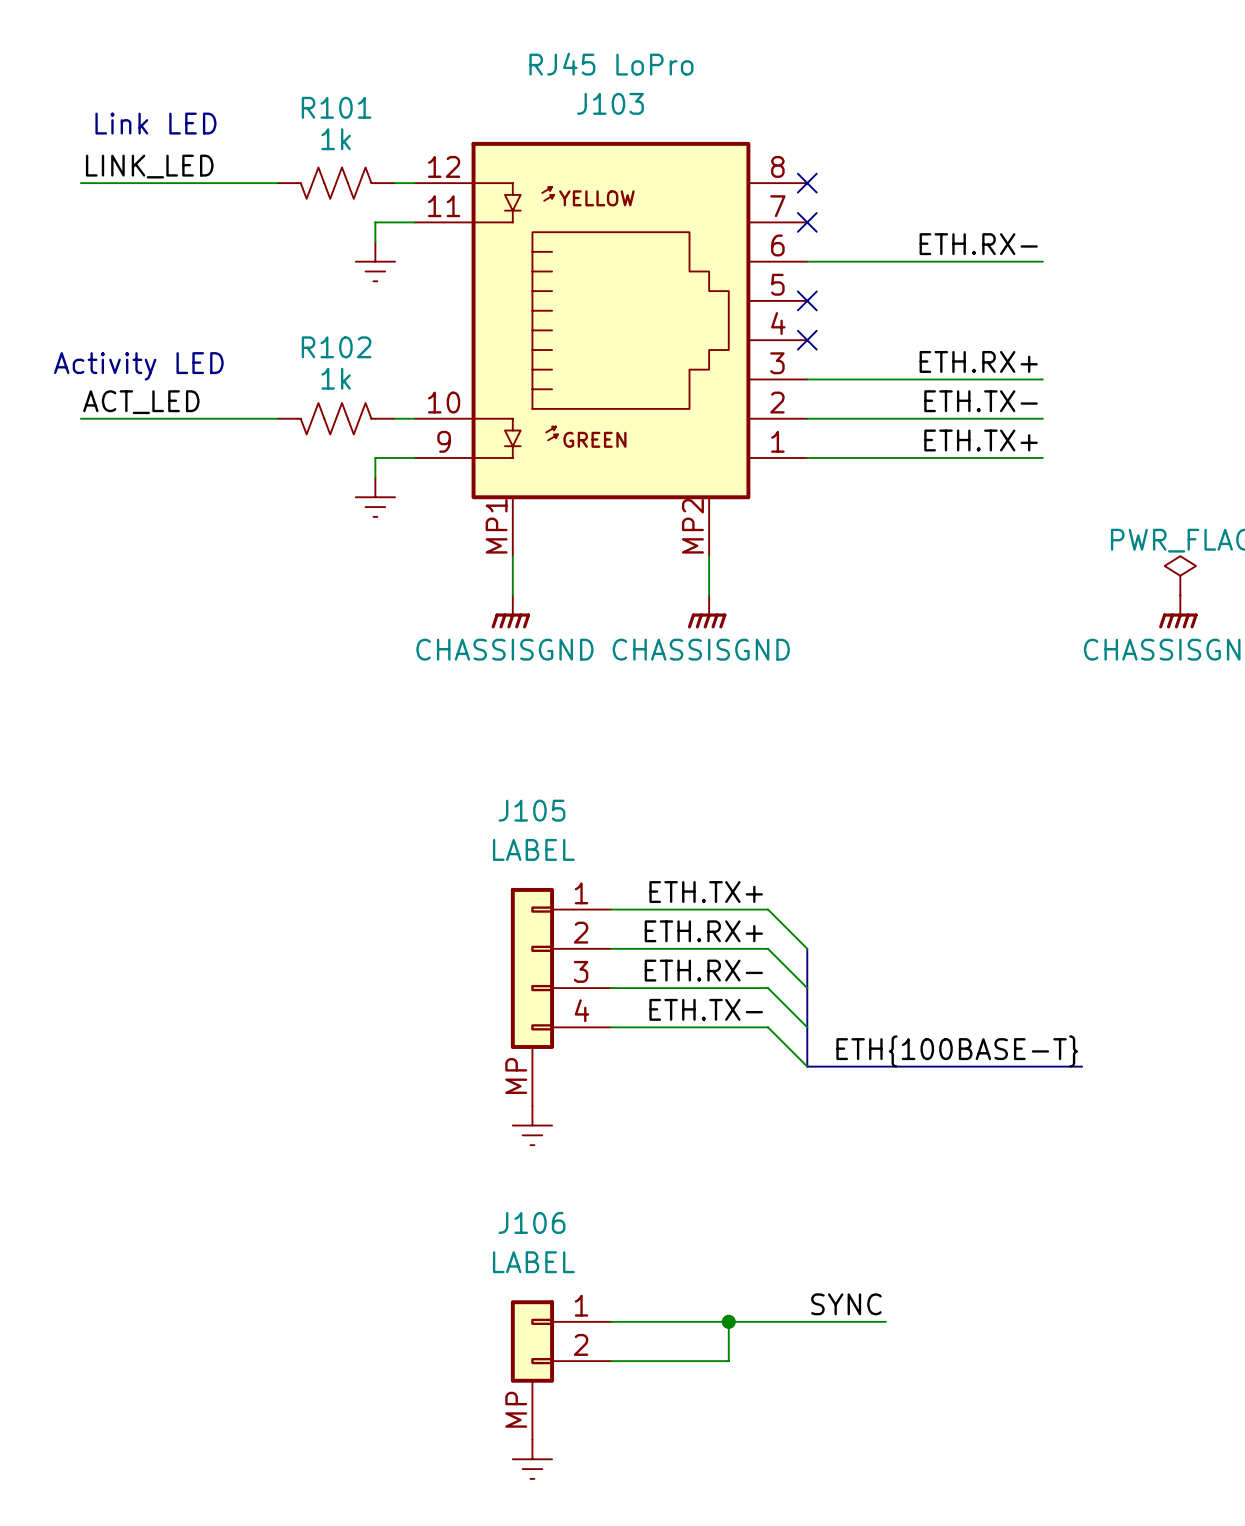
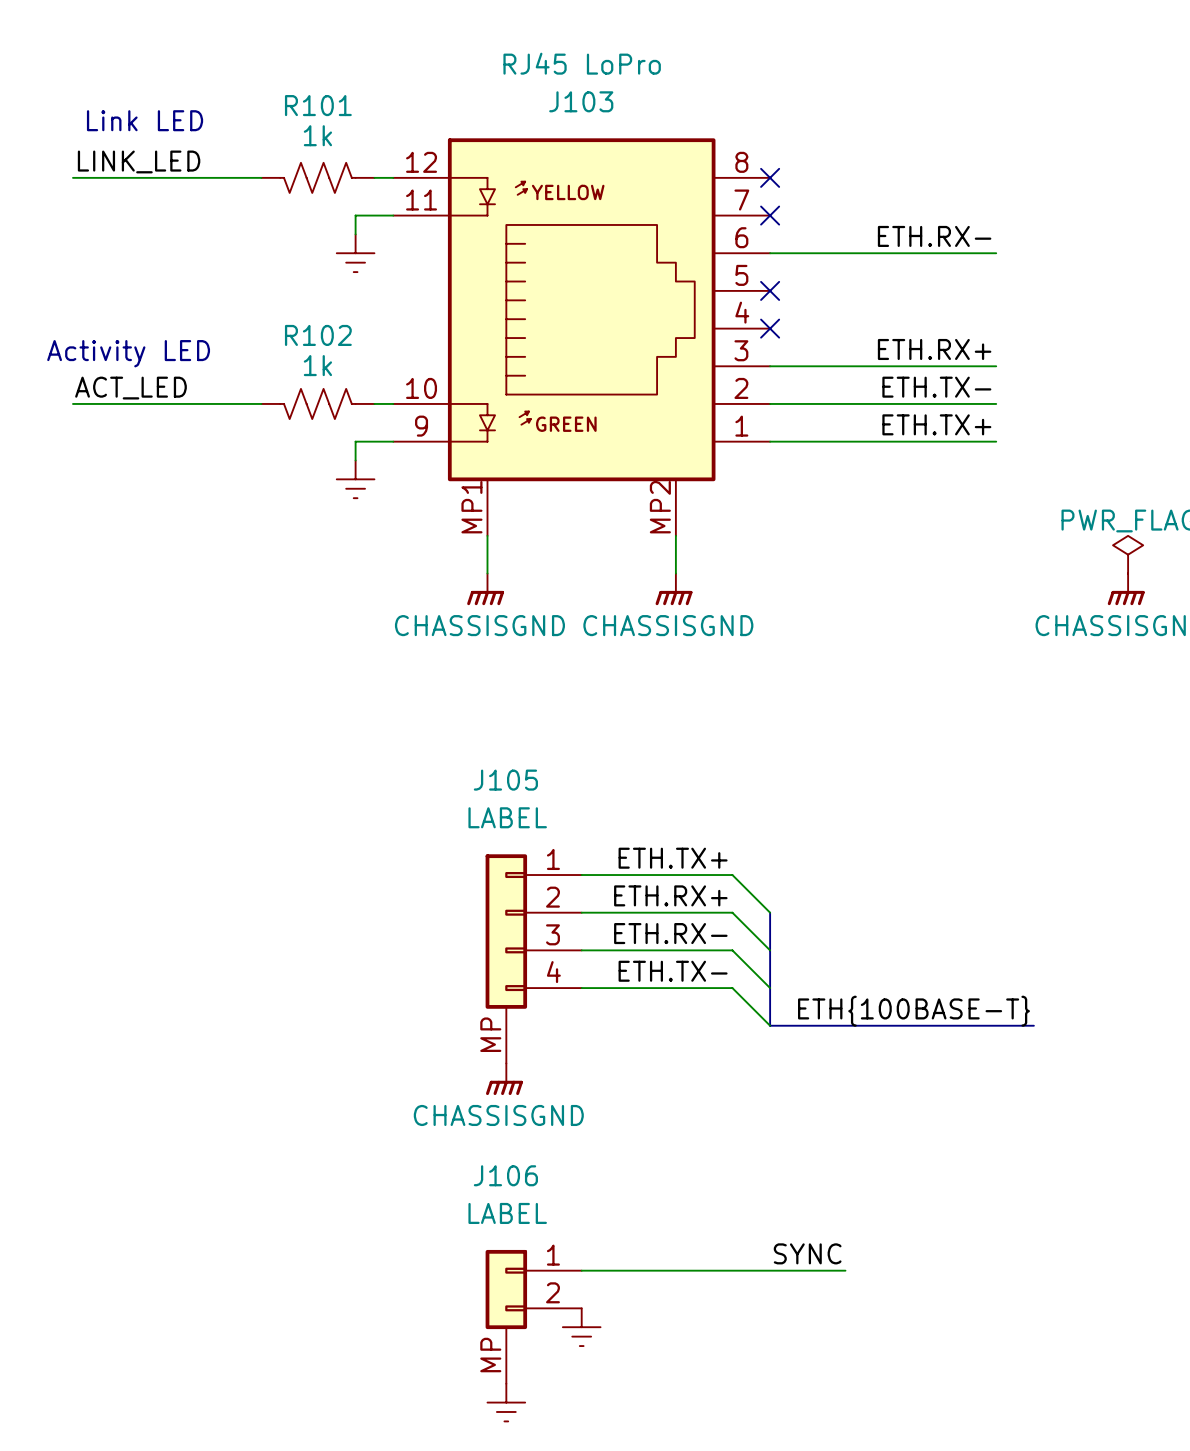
power symbol shape: [512, 1105, 553, 1146] -> [485, 1063, 523, 1096]
power symbol text: none -> CHASSISGND (498, 1115)
wire: (728, 1321) (728, 1361) (610, 1361) -> none
junction: (728, 1321) -> none
power symbol: none -> (581, 1327)

